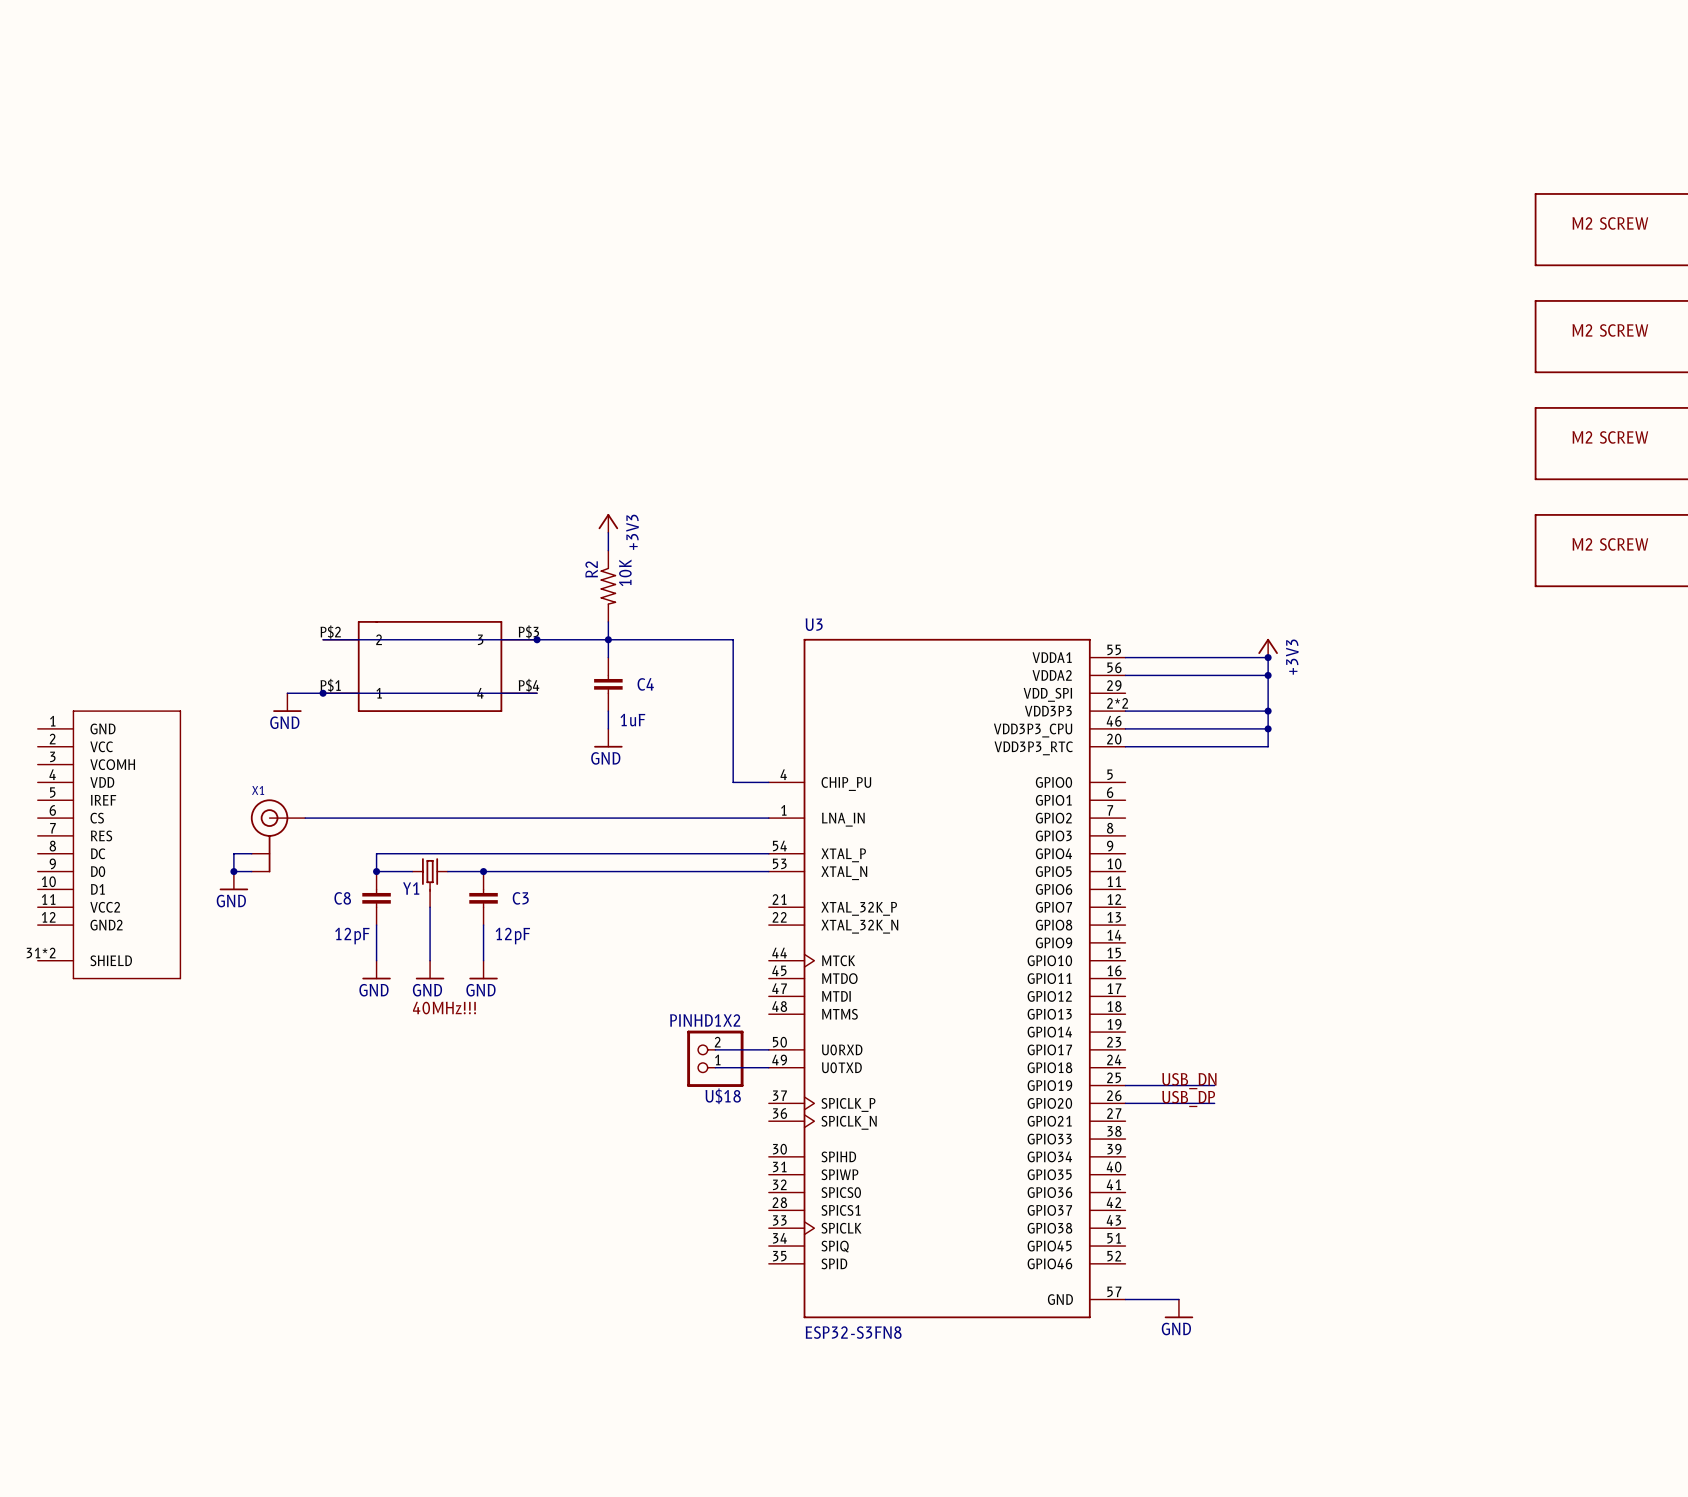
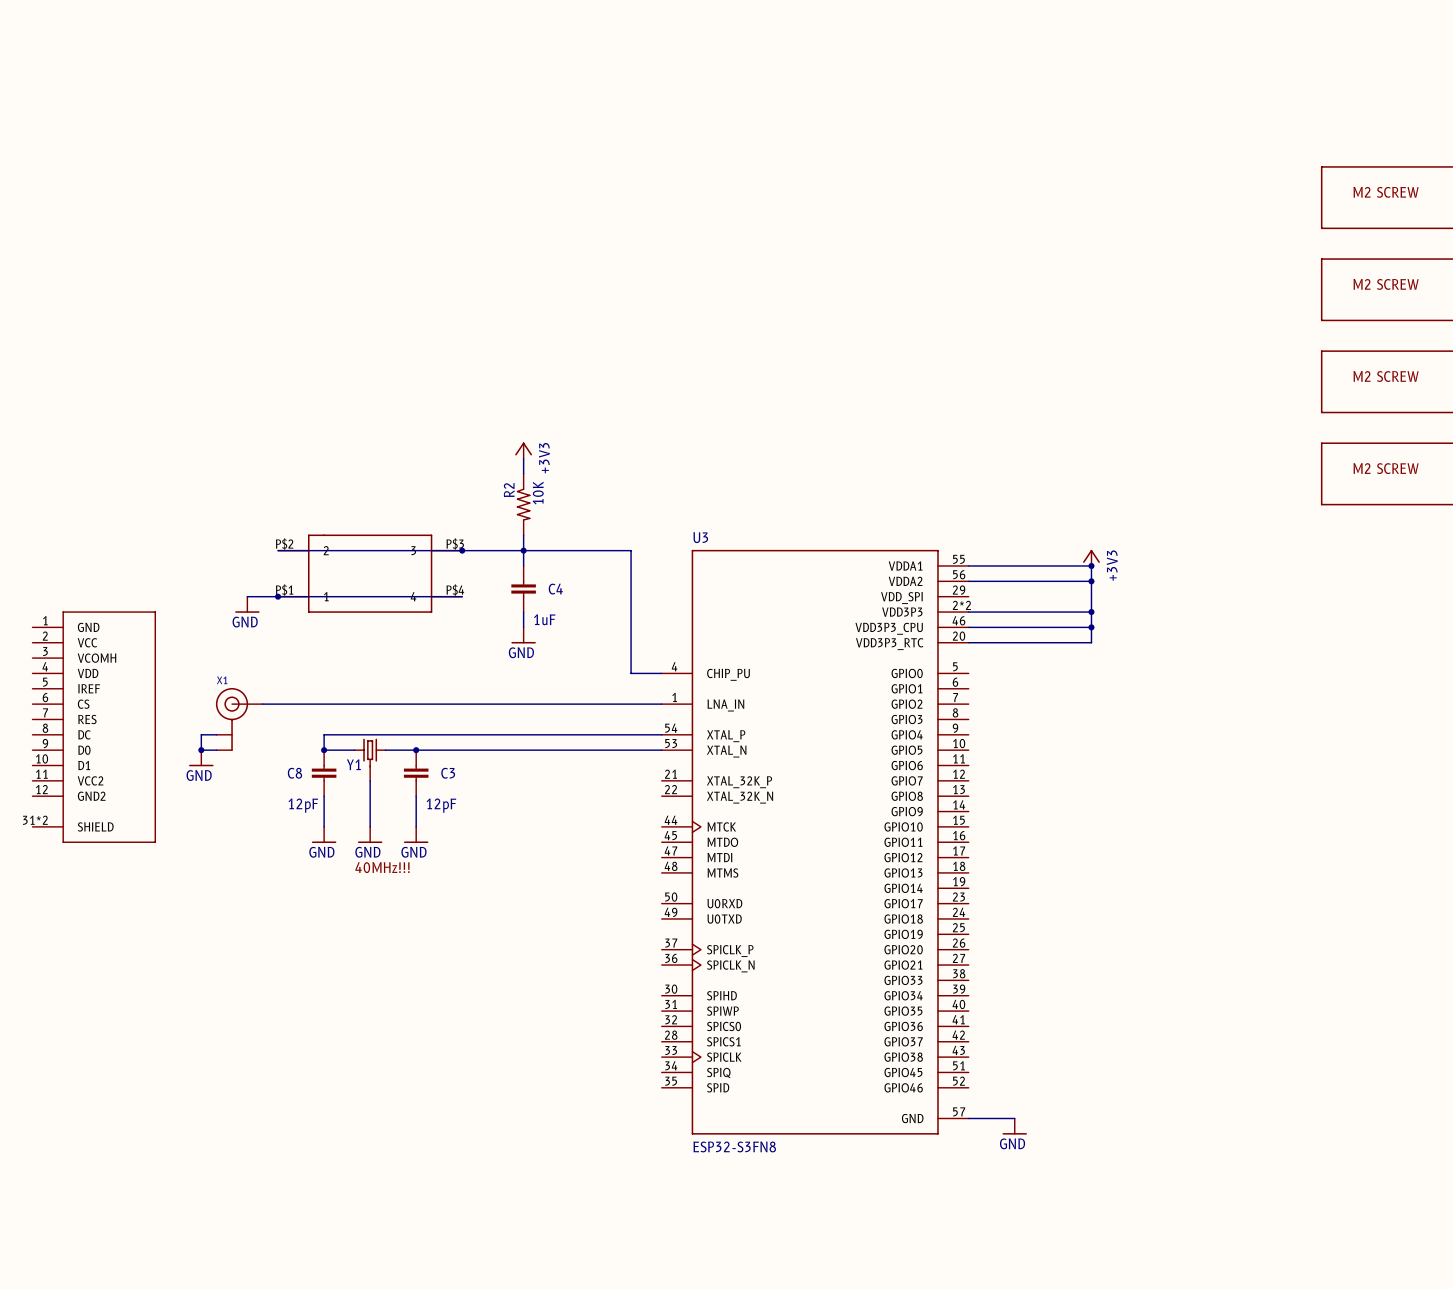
wire: (715, 1049) (768, 1049) -> none
U$18: PINHD1X2 (715, 1058) -> none
wire: (715, 1067) (768, 1067) -> none
label: USB_DN (1189, 1081) -> none
wire: (1125, 1085) (1214, 1085) -> none
label: USB_DP (1188, 1098) -> none
wire: (1125, 1103) (1214, 1103) -> none

